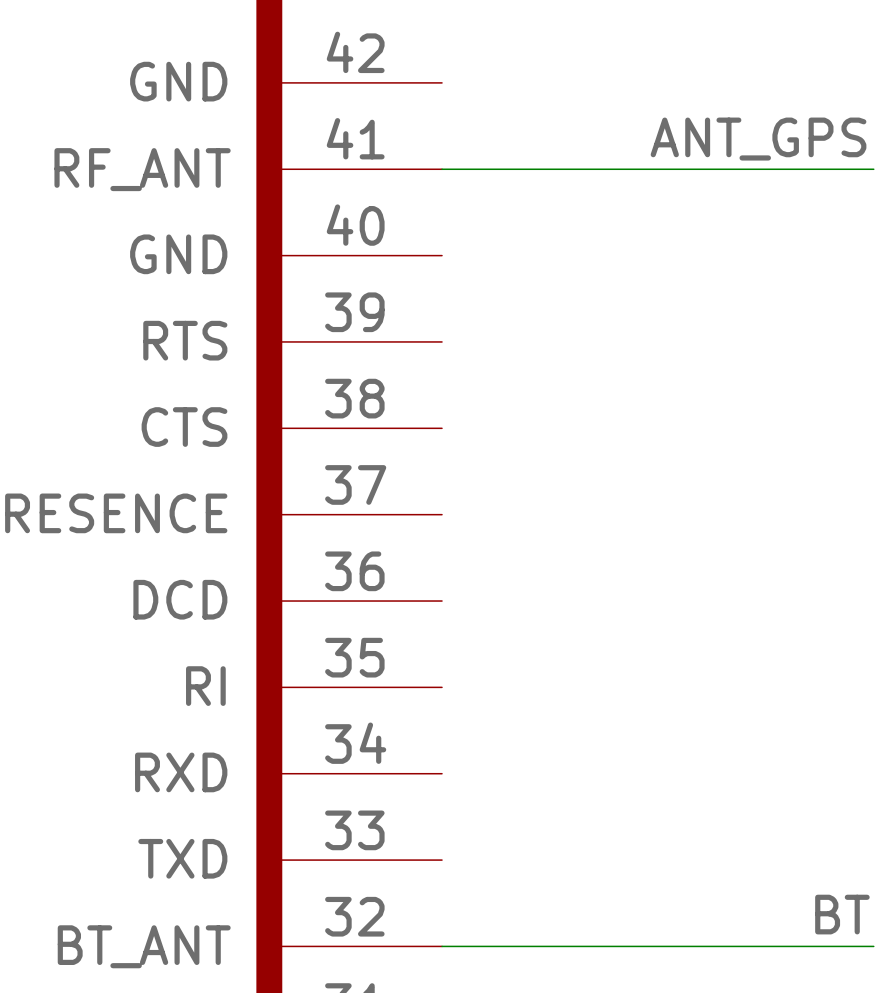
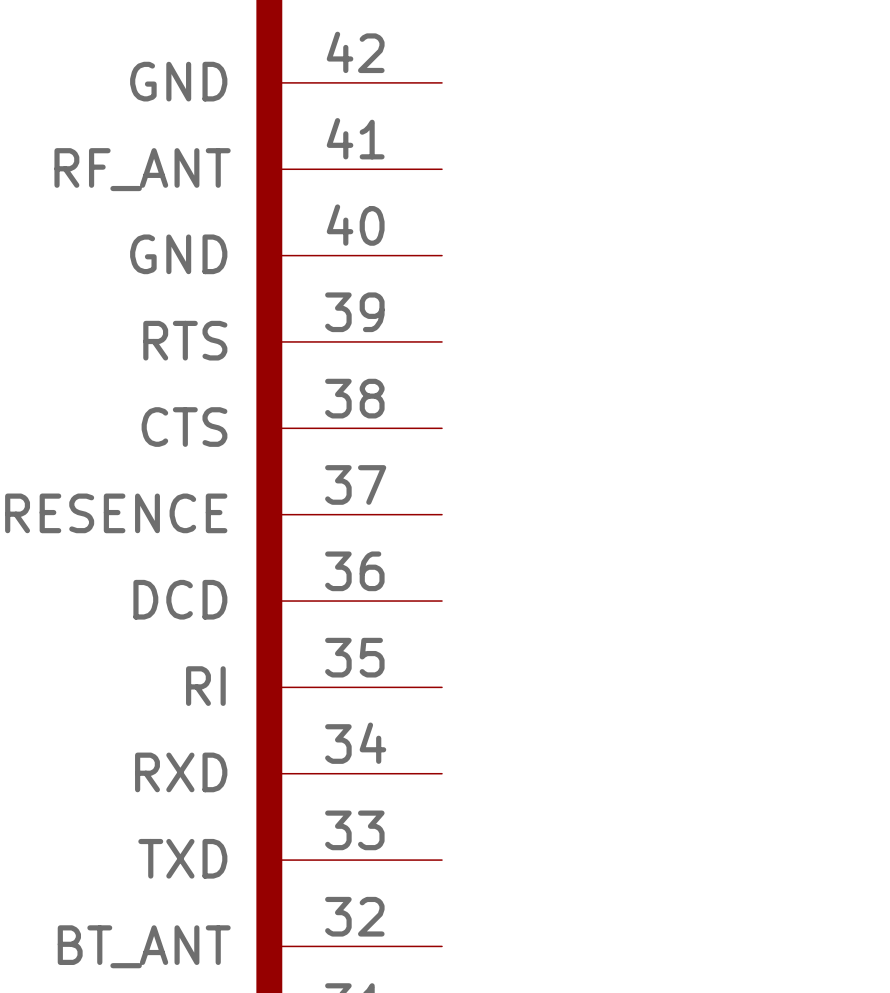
label: ANT_GPS (758, 139) -> none
wire: (442, 169) (873, 169) -> none
label: BT (842, 914) -> none
wire: (442, 946) (873, 946) -> none

